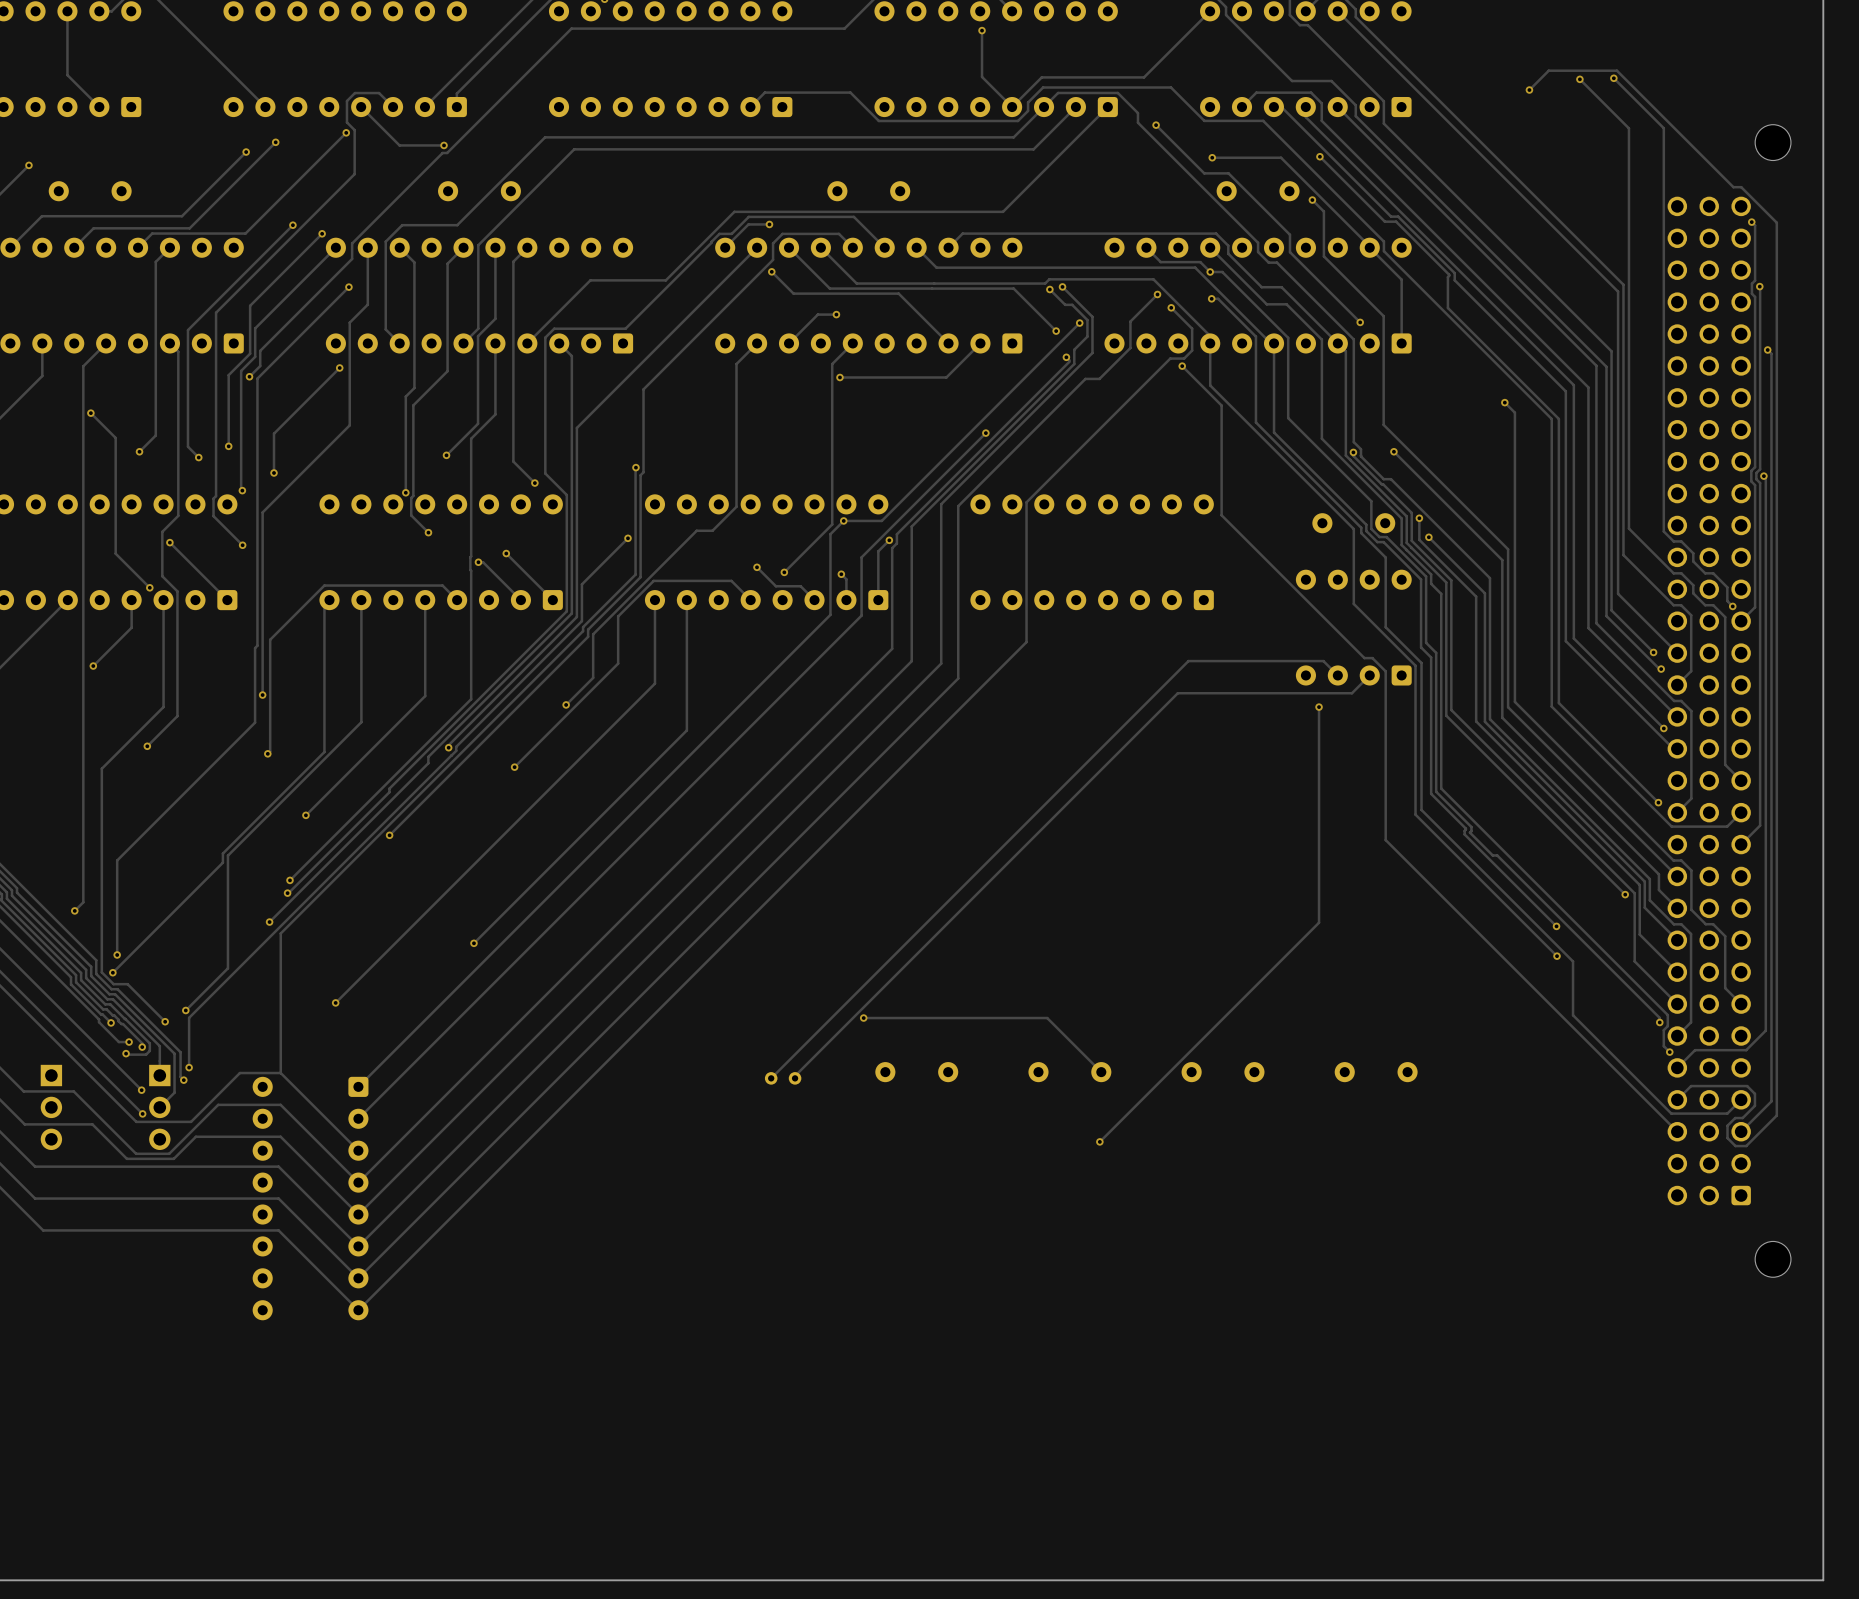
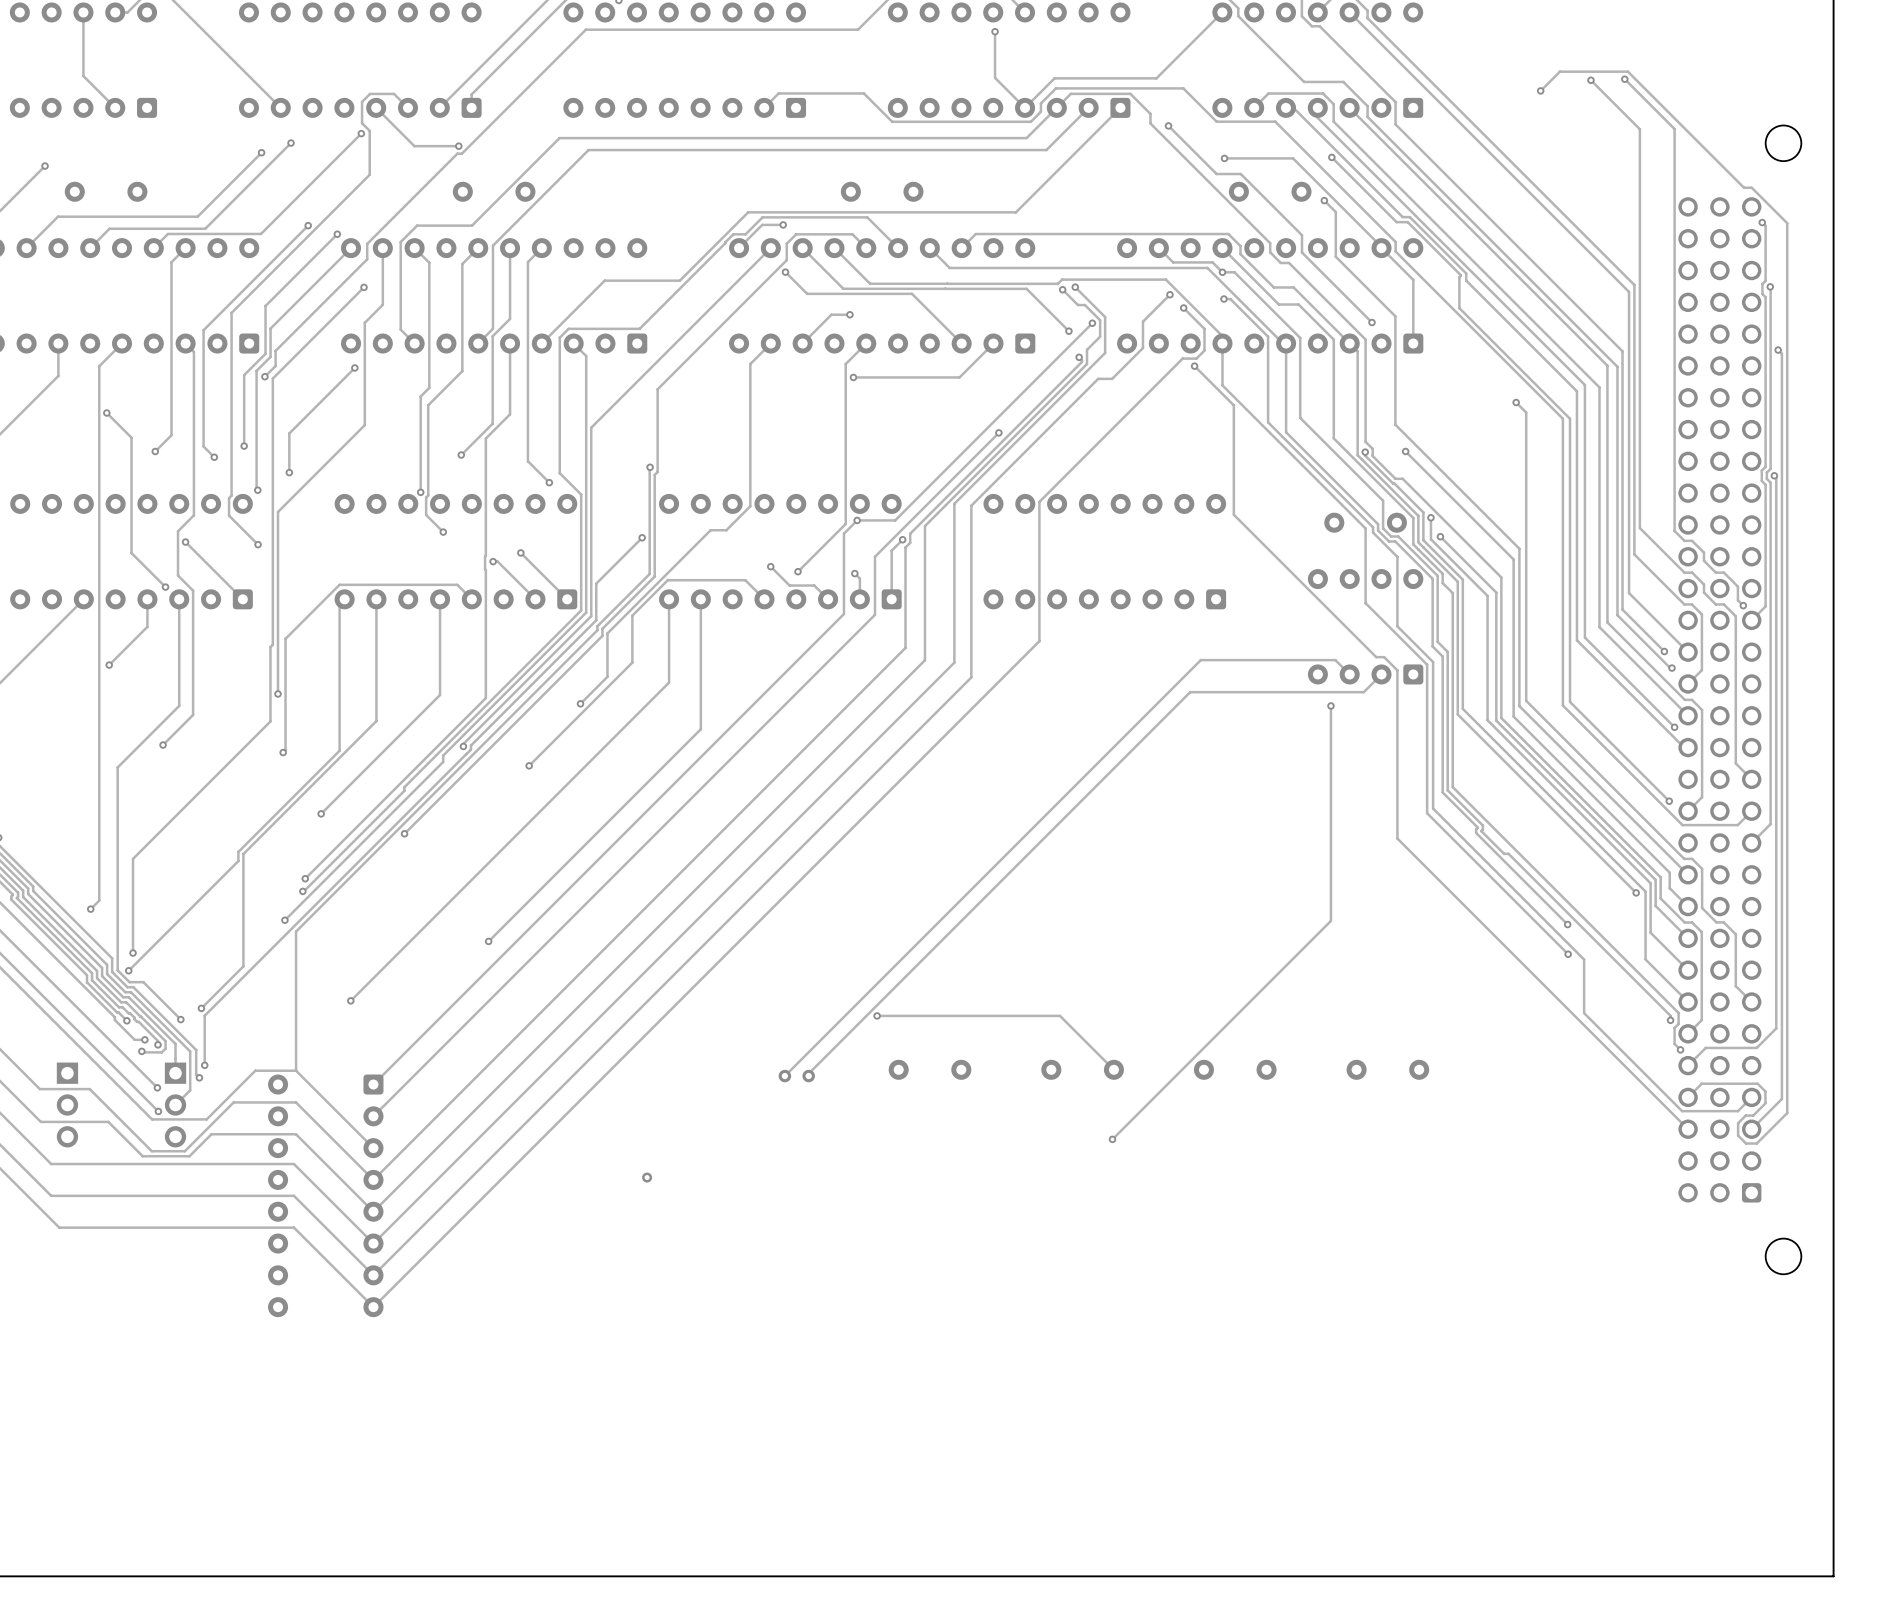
via: none -> (647, 1177)

